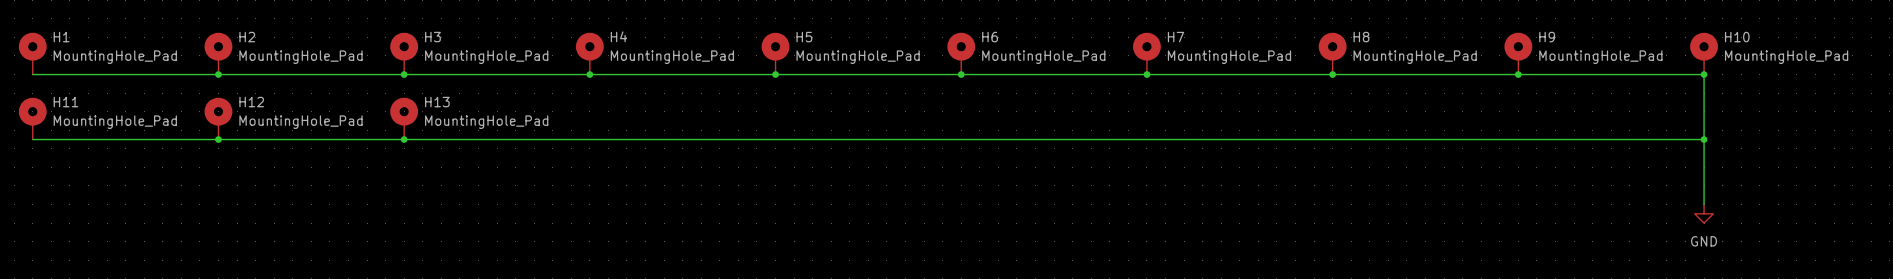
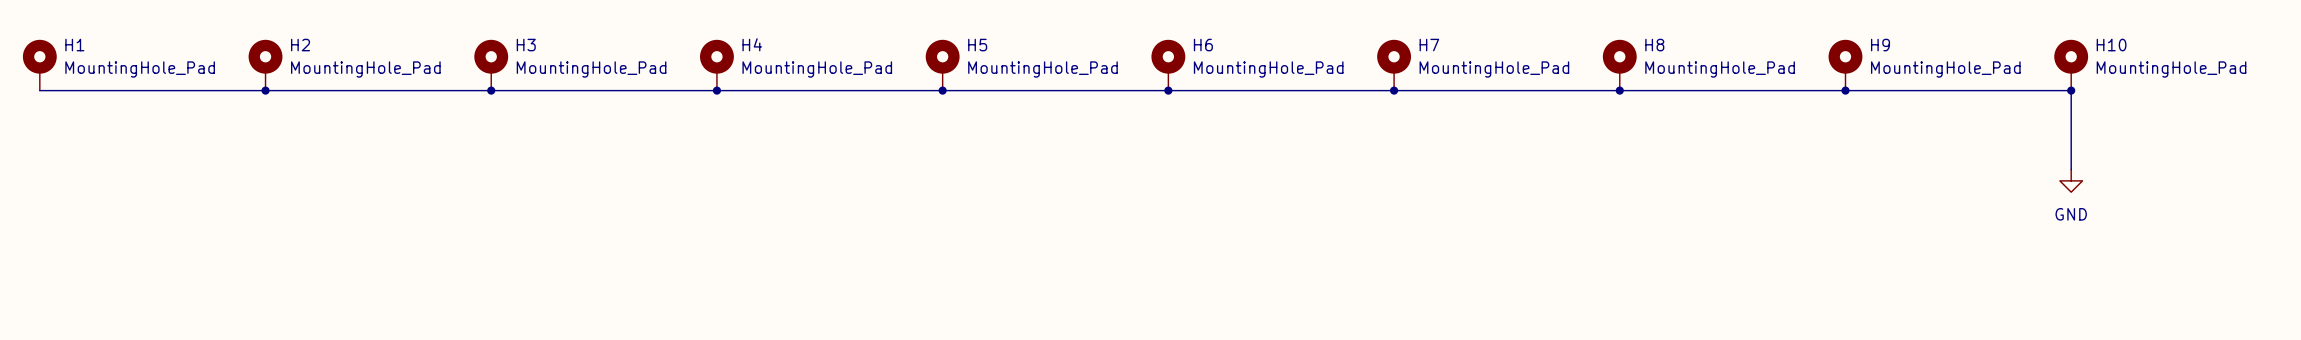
H11: MountingHole_Pad (32, 118) -> none
H12: MountingHole_Pad (218, 118) -> none
H13: MountingHole_Pad (404, 118) -> none
wire: (32, 139) (1704, 139) (1704, 204) -> none
junction: (218, 139) -> none
junction: (404, 139) -> none
junction: (1704, 139) -> none
power symbol position: GND (1704, 213) -> GND (2071, 180)

